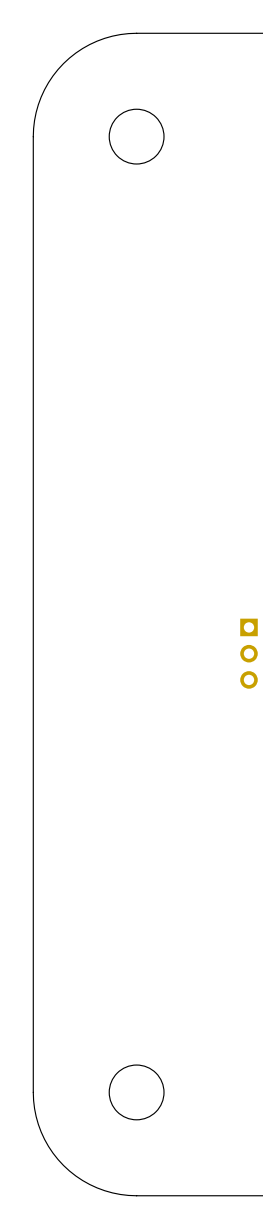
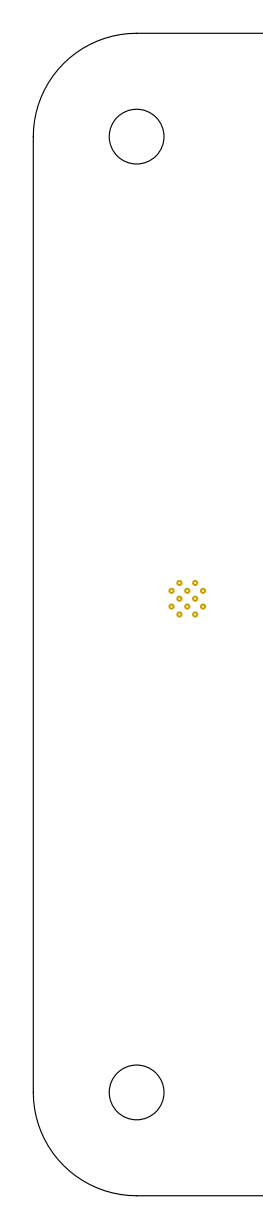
part: none -> (187, 598)
part: (248, 653) -> none

